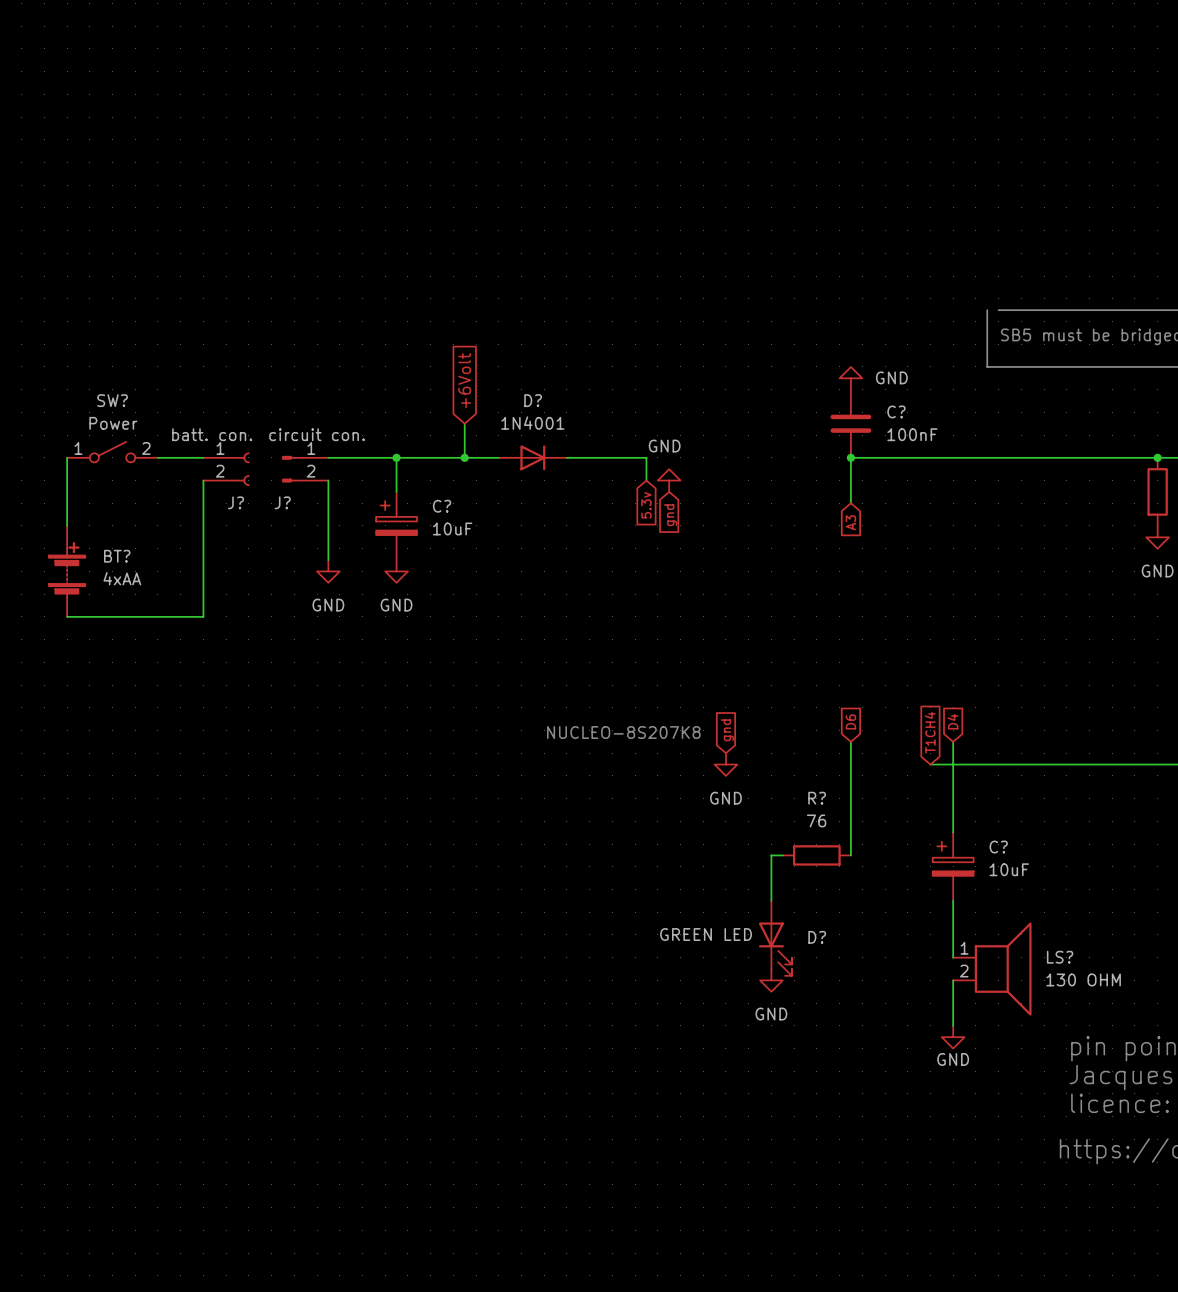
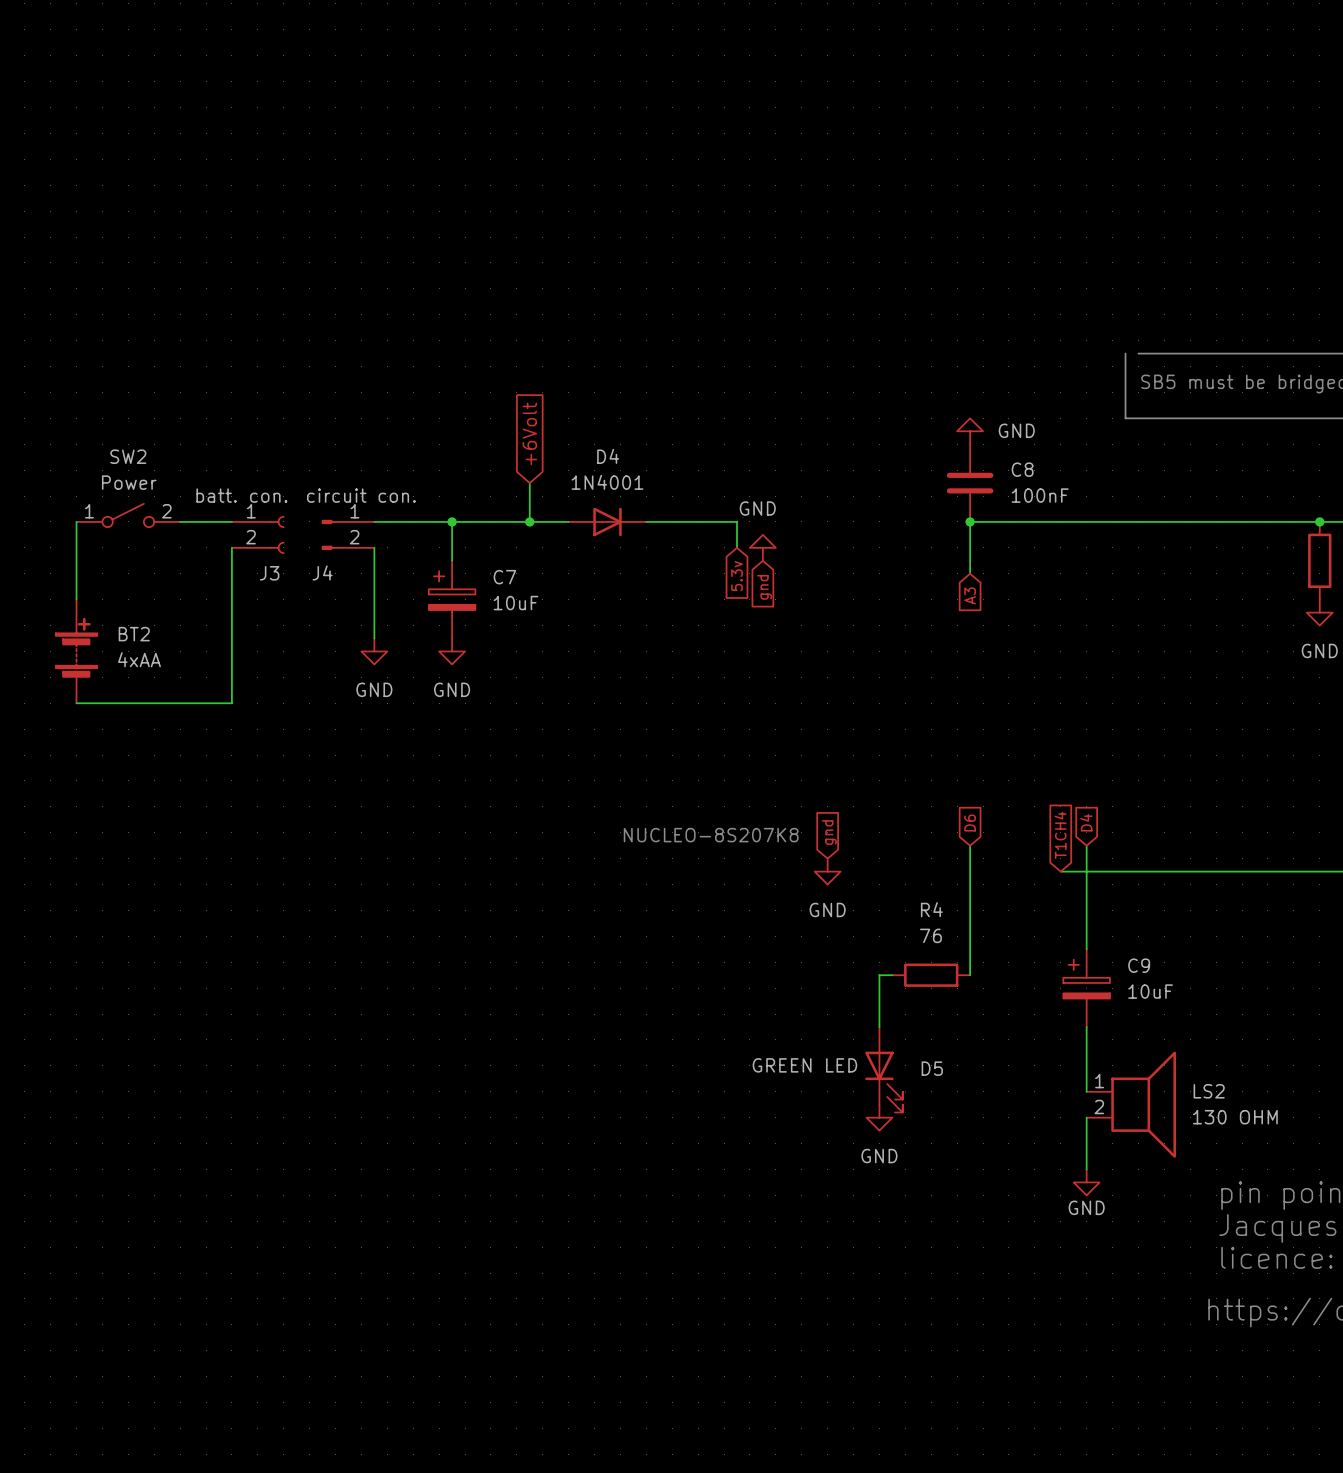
SW? name: SW? (112, 400) -> SW2 (128, 456)
D? name: D? (533, 400) -> D4 (608, 456)
C? name: C? (896, 411) -> C8 (1022, 469)
J? name: J? (235, 502) -> J3 (269, 573)
J? name: J? (282, 502) -> J4 (322, 572)
C? name: C? (442, 506) -> C7 (504, 577)
BT? name: BT? (117, 556) -> BT2 (134, 634)
R? name: R? (817, 798) -> R4 (931, 909)
C? name: C? (998, 847) -> C9 (1139, 965)
D? name: D? (817, 937) -> D5 (932, 1068)
LS? name: LS? (1060, 957) -> LS2 (1209, 1091)

